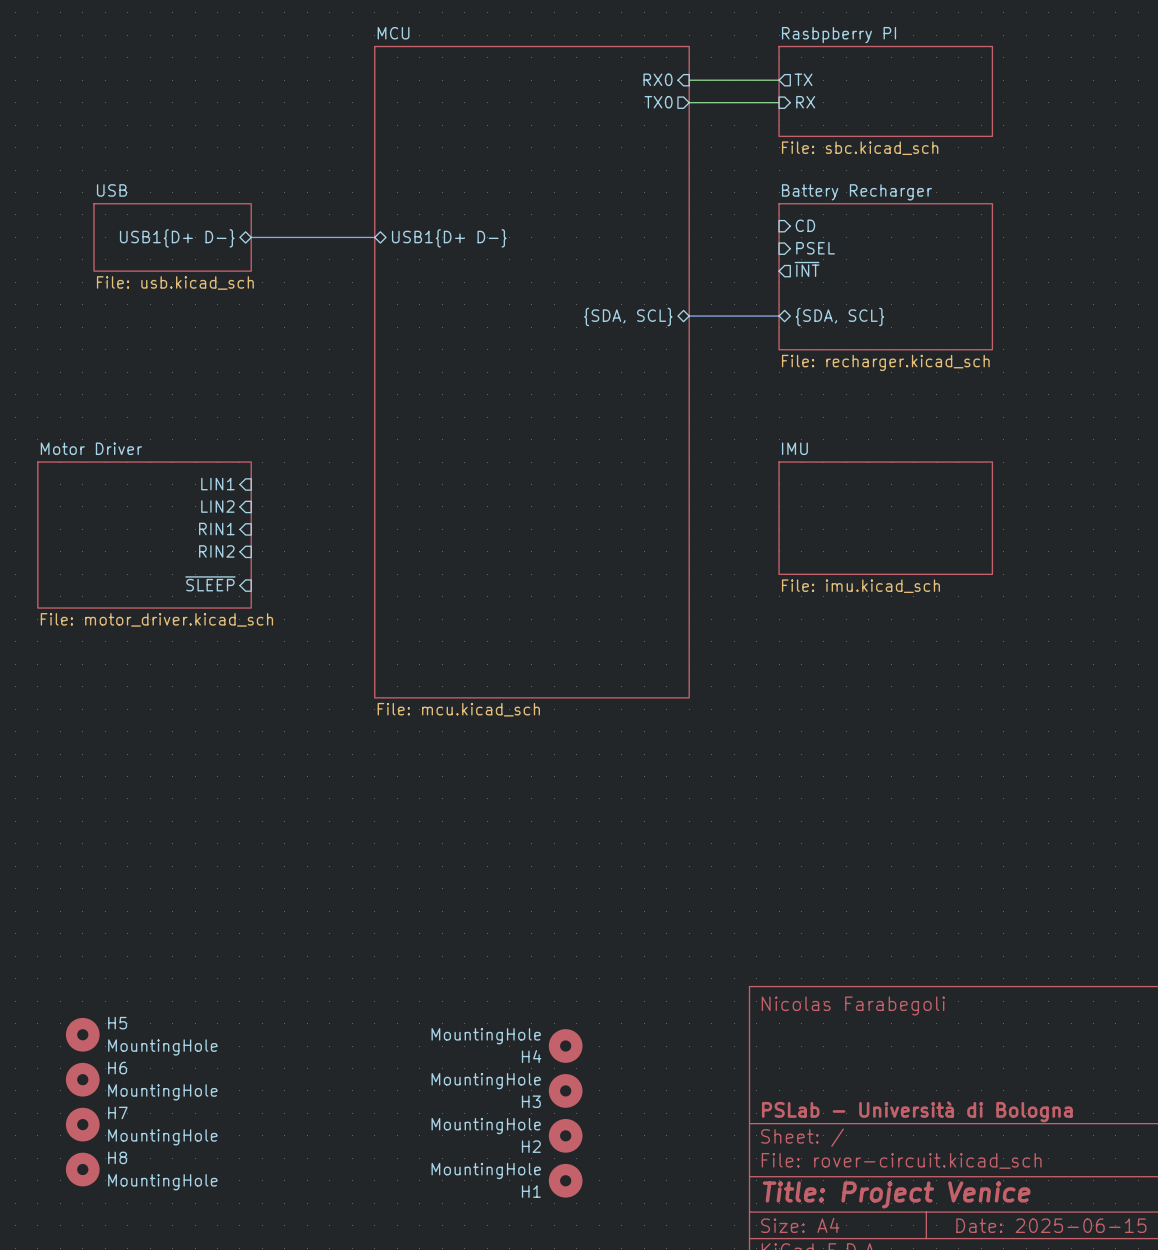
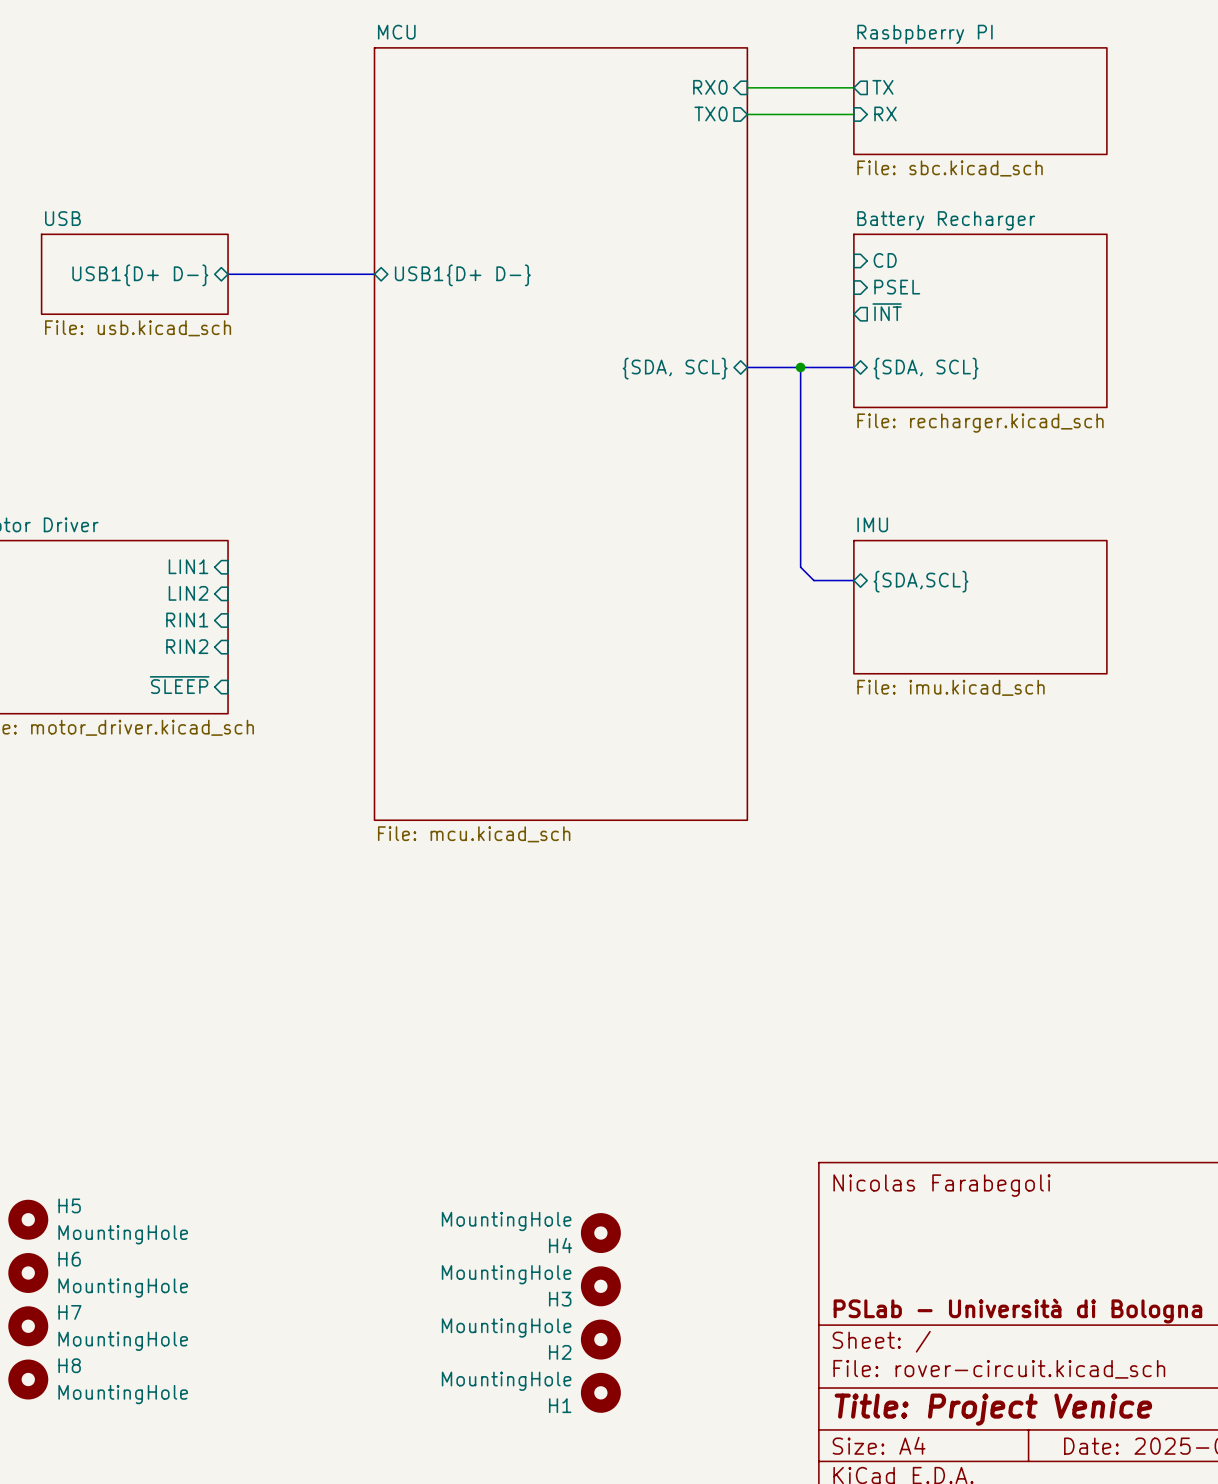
bus: none -> (800, 367) (800, 567) (813, 580) (853, 580)
junction: none -> (800, 367)
sheet pin: none -> {SDA,SCL} (921, 581)

